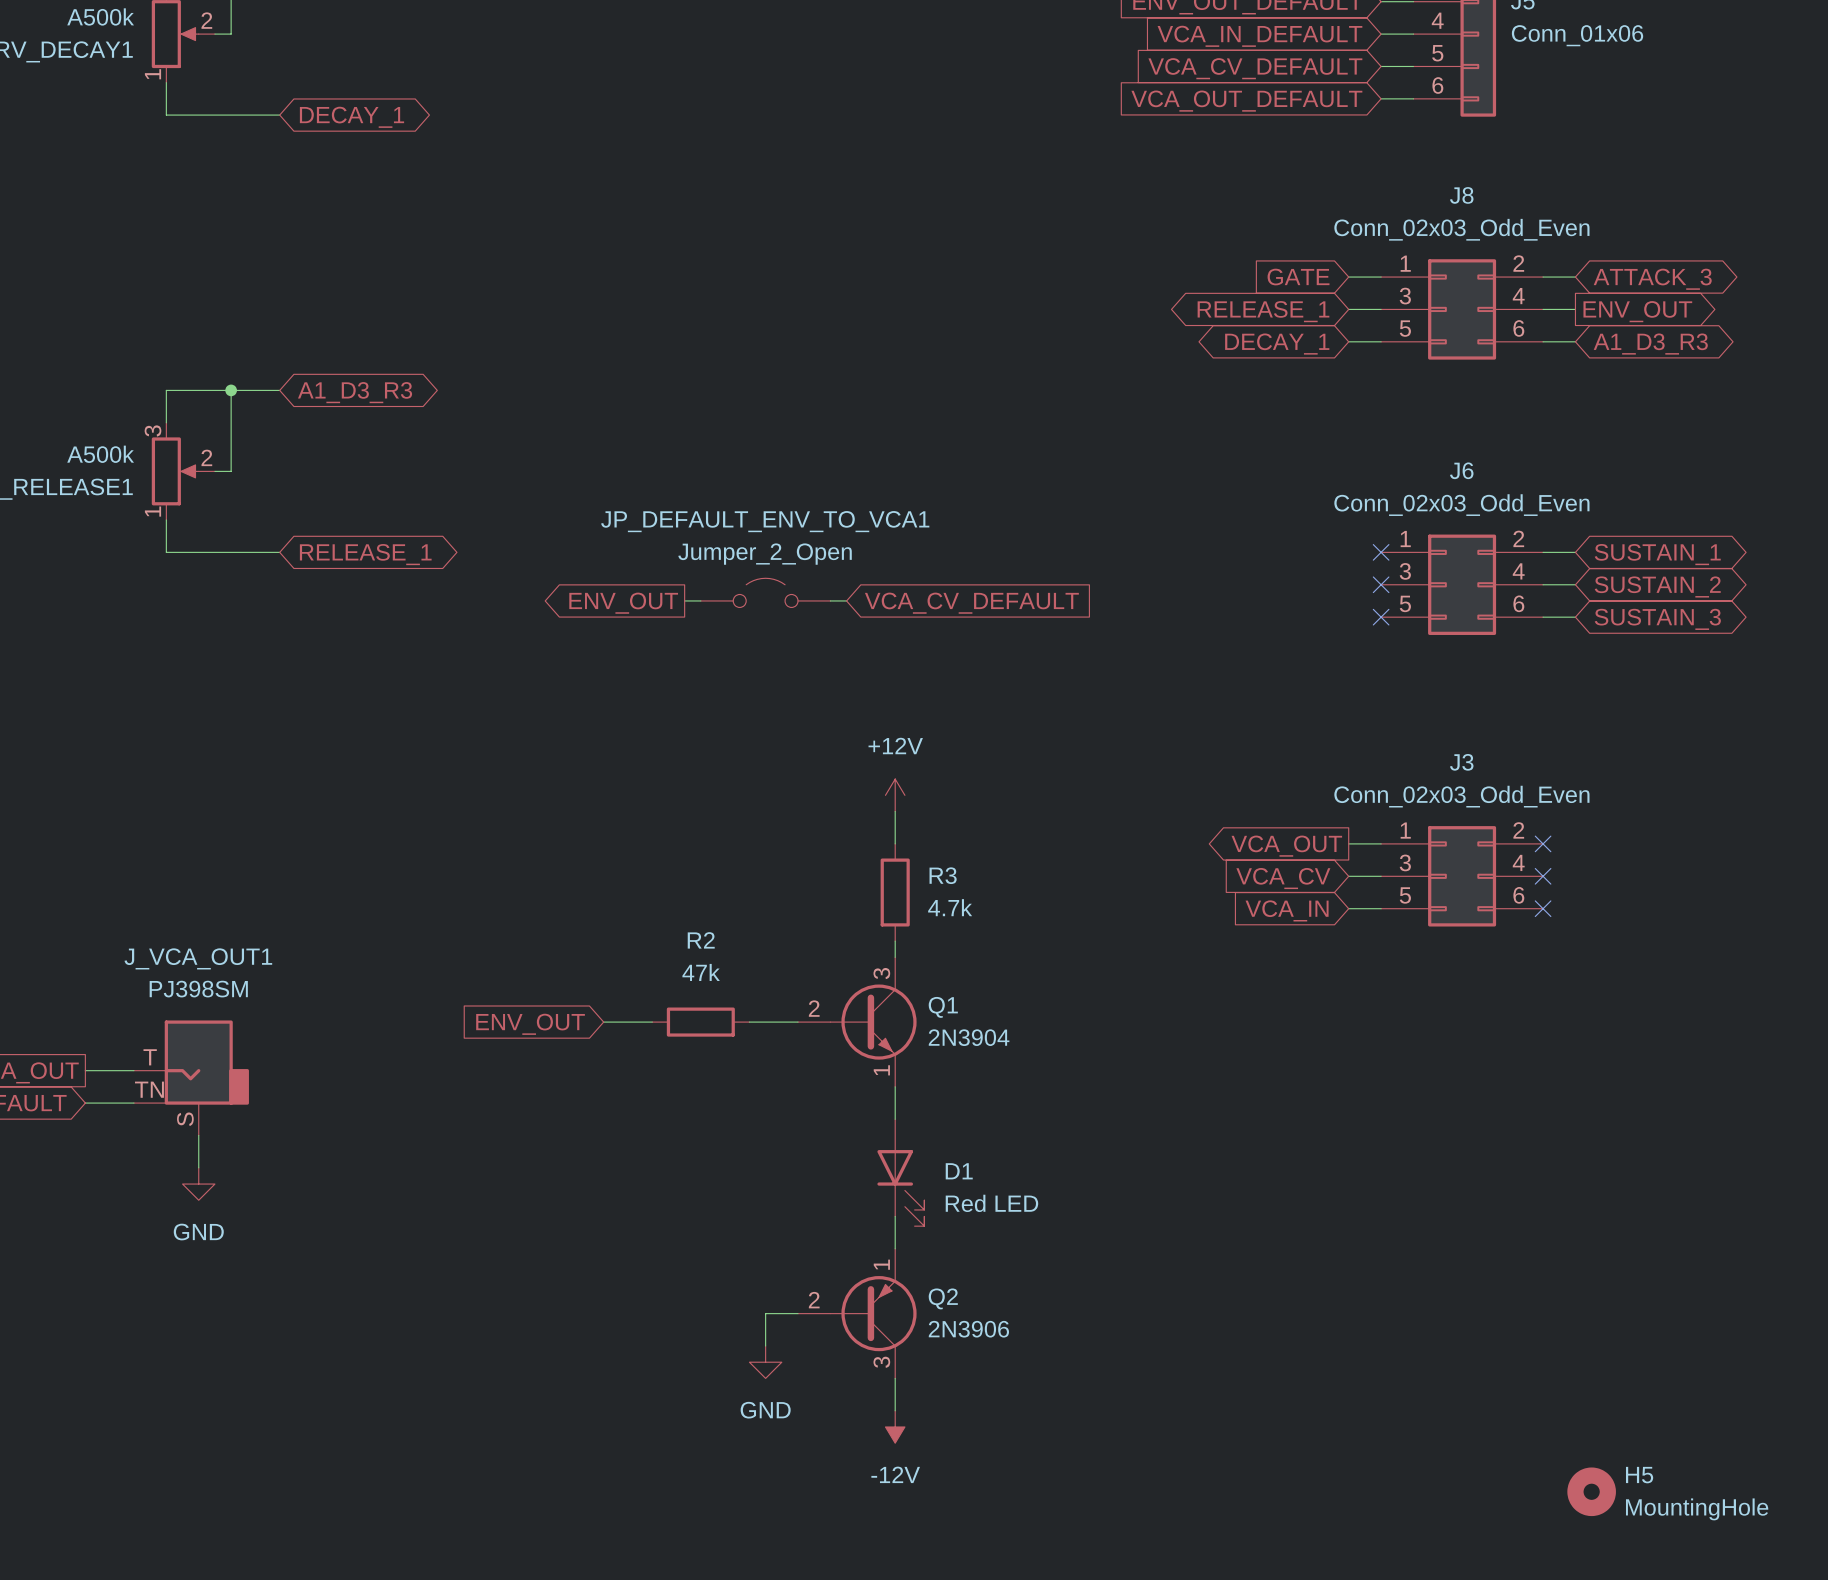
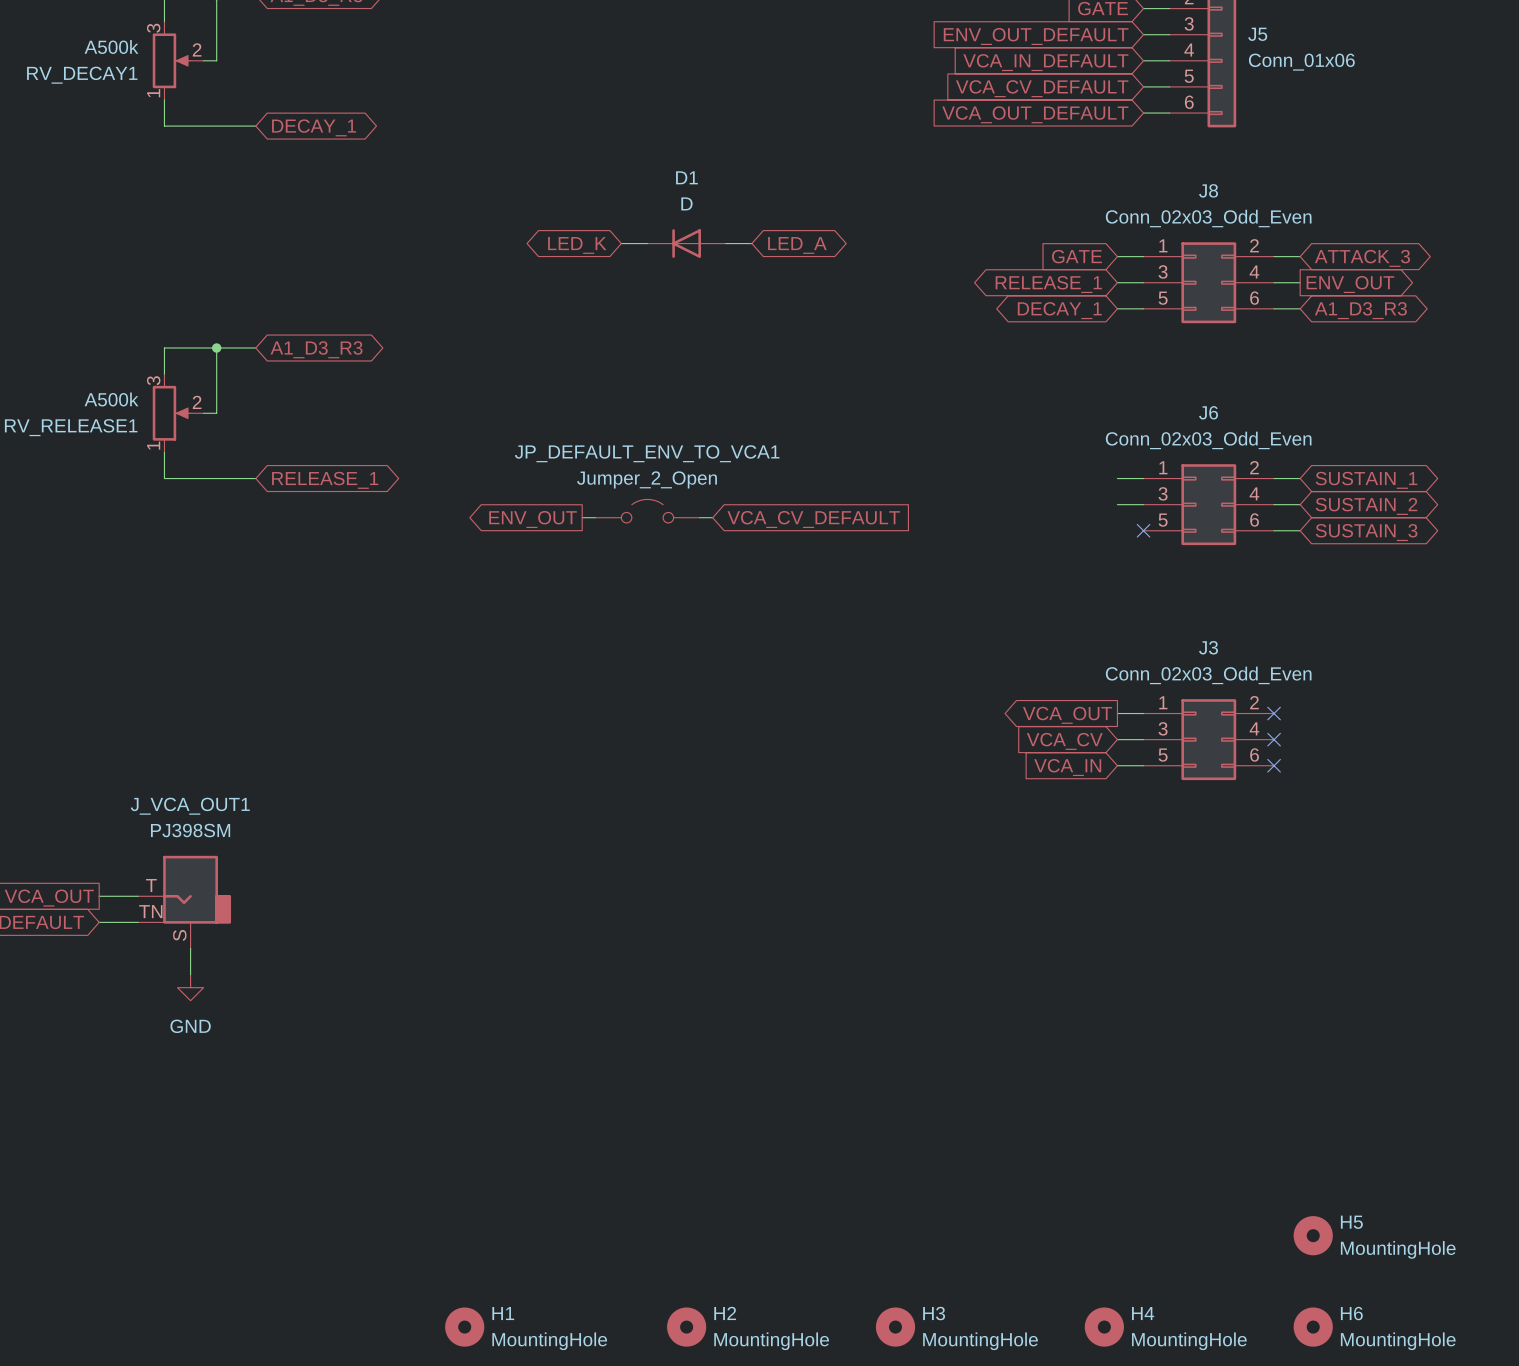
wire: none -> (621, 243) (647, 243)
wire: none -> (725, 243) (751, 243)
global label: none -> LED_K (577, 245)
global label: none -> LED_A (797, 245)
wire: none -> (1117, 478) (1143, 478)
no-connect mark: (1381, 552) -> none
wire: none -> (1117, 504) (1143, 504)
no-connect mark: (1381, 584) -> none
power symbol: +12V (895, 795) -> none
wire: (895, 811) (895, 843) -> none
R3: 4.7k (895, 892) -> none
wire: (895, 941) (895, 957) -> none
wire: (603, 1022) (652, 1022) -> none
R2: 47k (700, 1022) -> none
wire: (749, 1022) (798, 1022) -> none
Q1: 2N3904 (857, 1022) -> none
global label: ENV_OUT (530, 1024) -> none
wire: (895, 1086) (895, 1119) -> none
D1 symbol: [877, 1119, 925, 1227] -> [647, 229, 726, 258]
D1 name position: D1 (959, 1171) -> D1 (686, 177)
D1 value: Red LED (991, 1203) -> D (686, 203)
wire: (895, 1216) (895, 1248) -> none
wire: (798, 1313) (765, 1313) (765, 1346) -> none
Q2: 2N3906 (857, 1313) -> none
power symbol: GND (765, 1362) -> none
wire: (895, 1378) (895, 1410) -> none
power symbol: -12V (895, 1426) -> none

